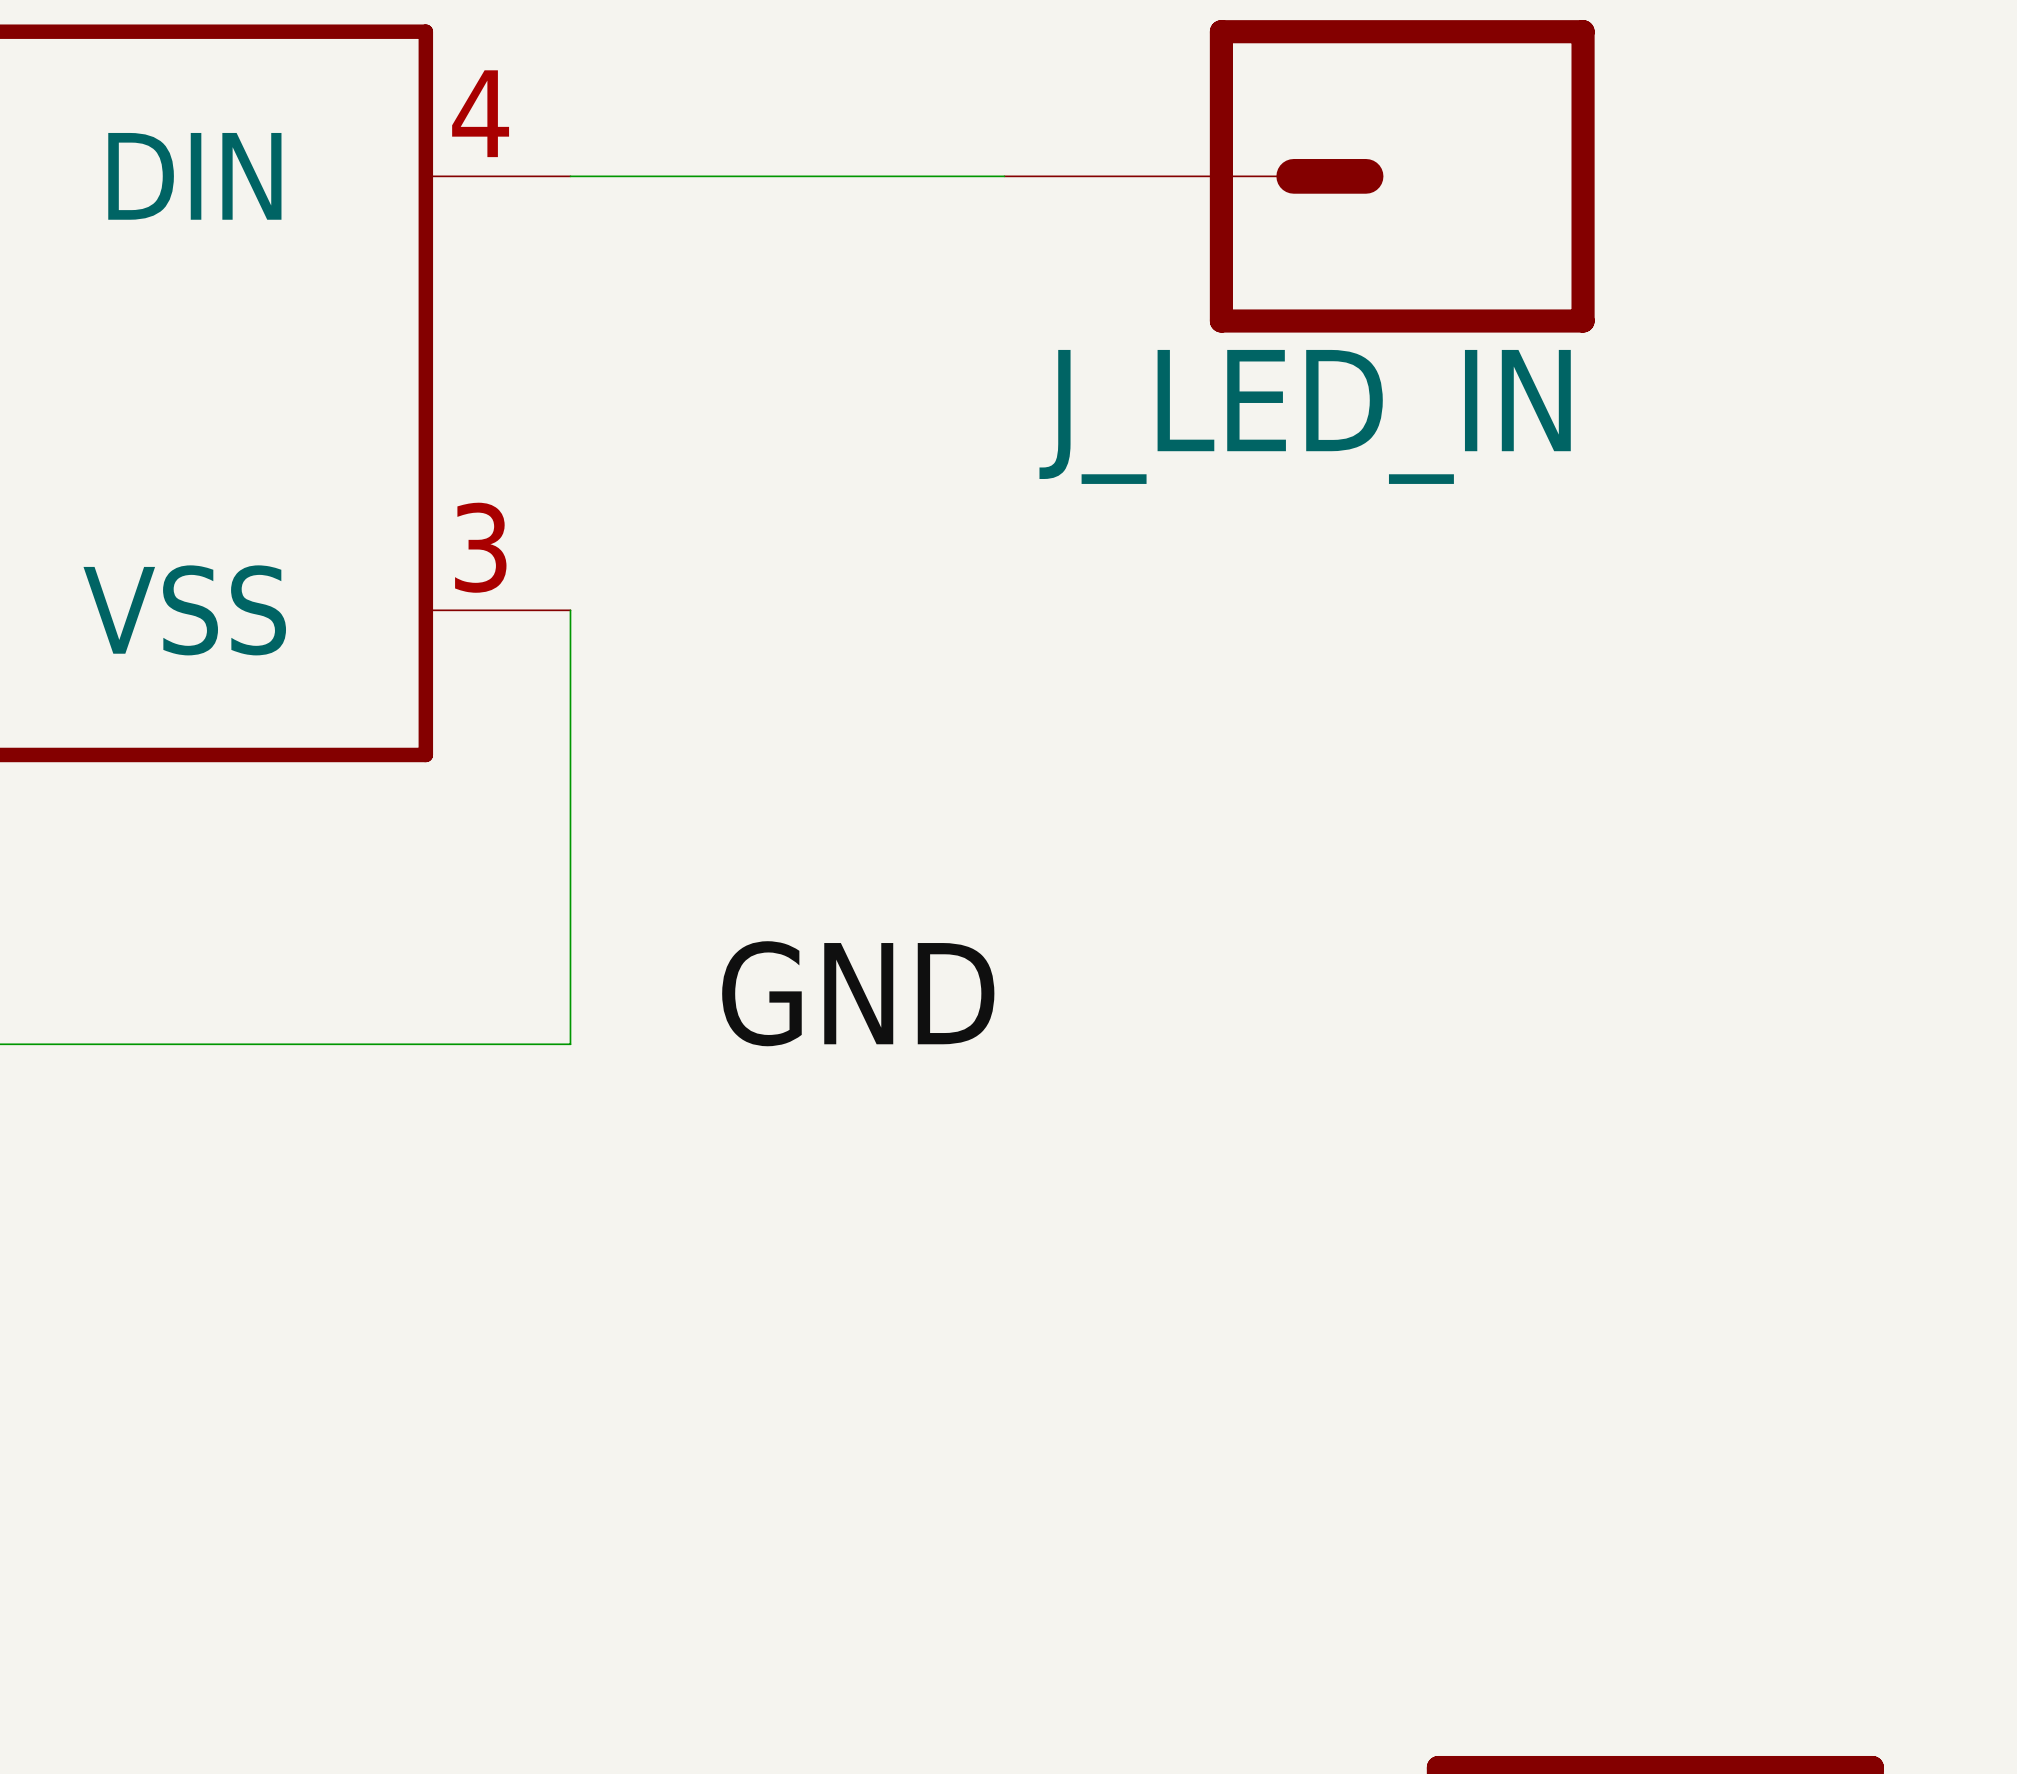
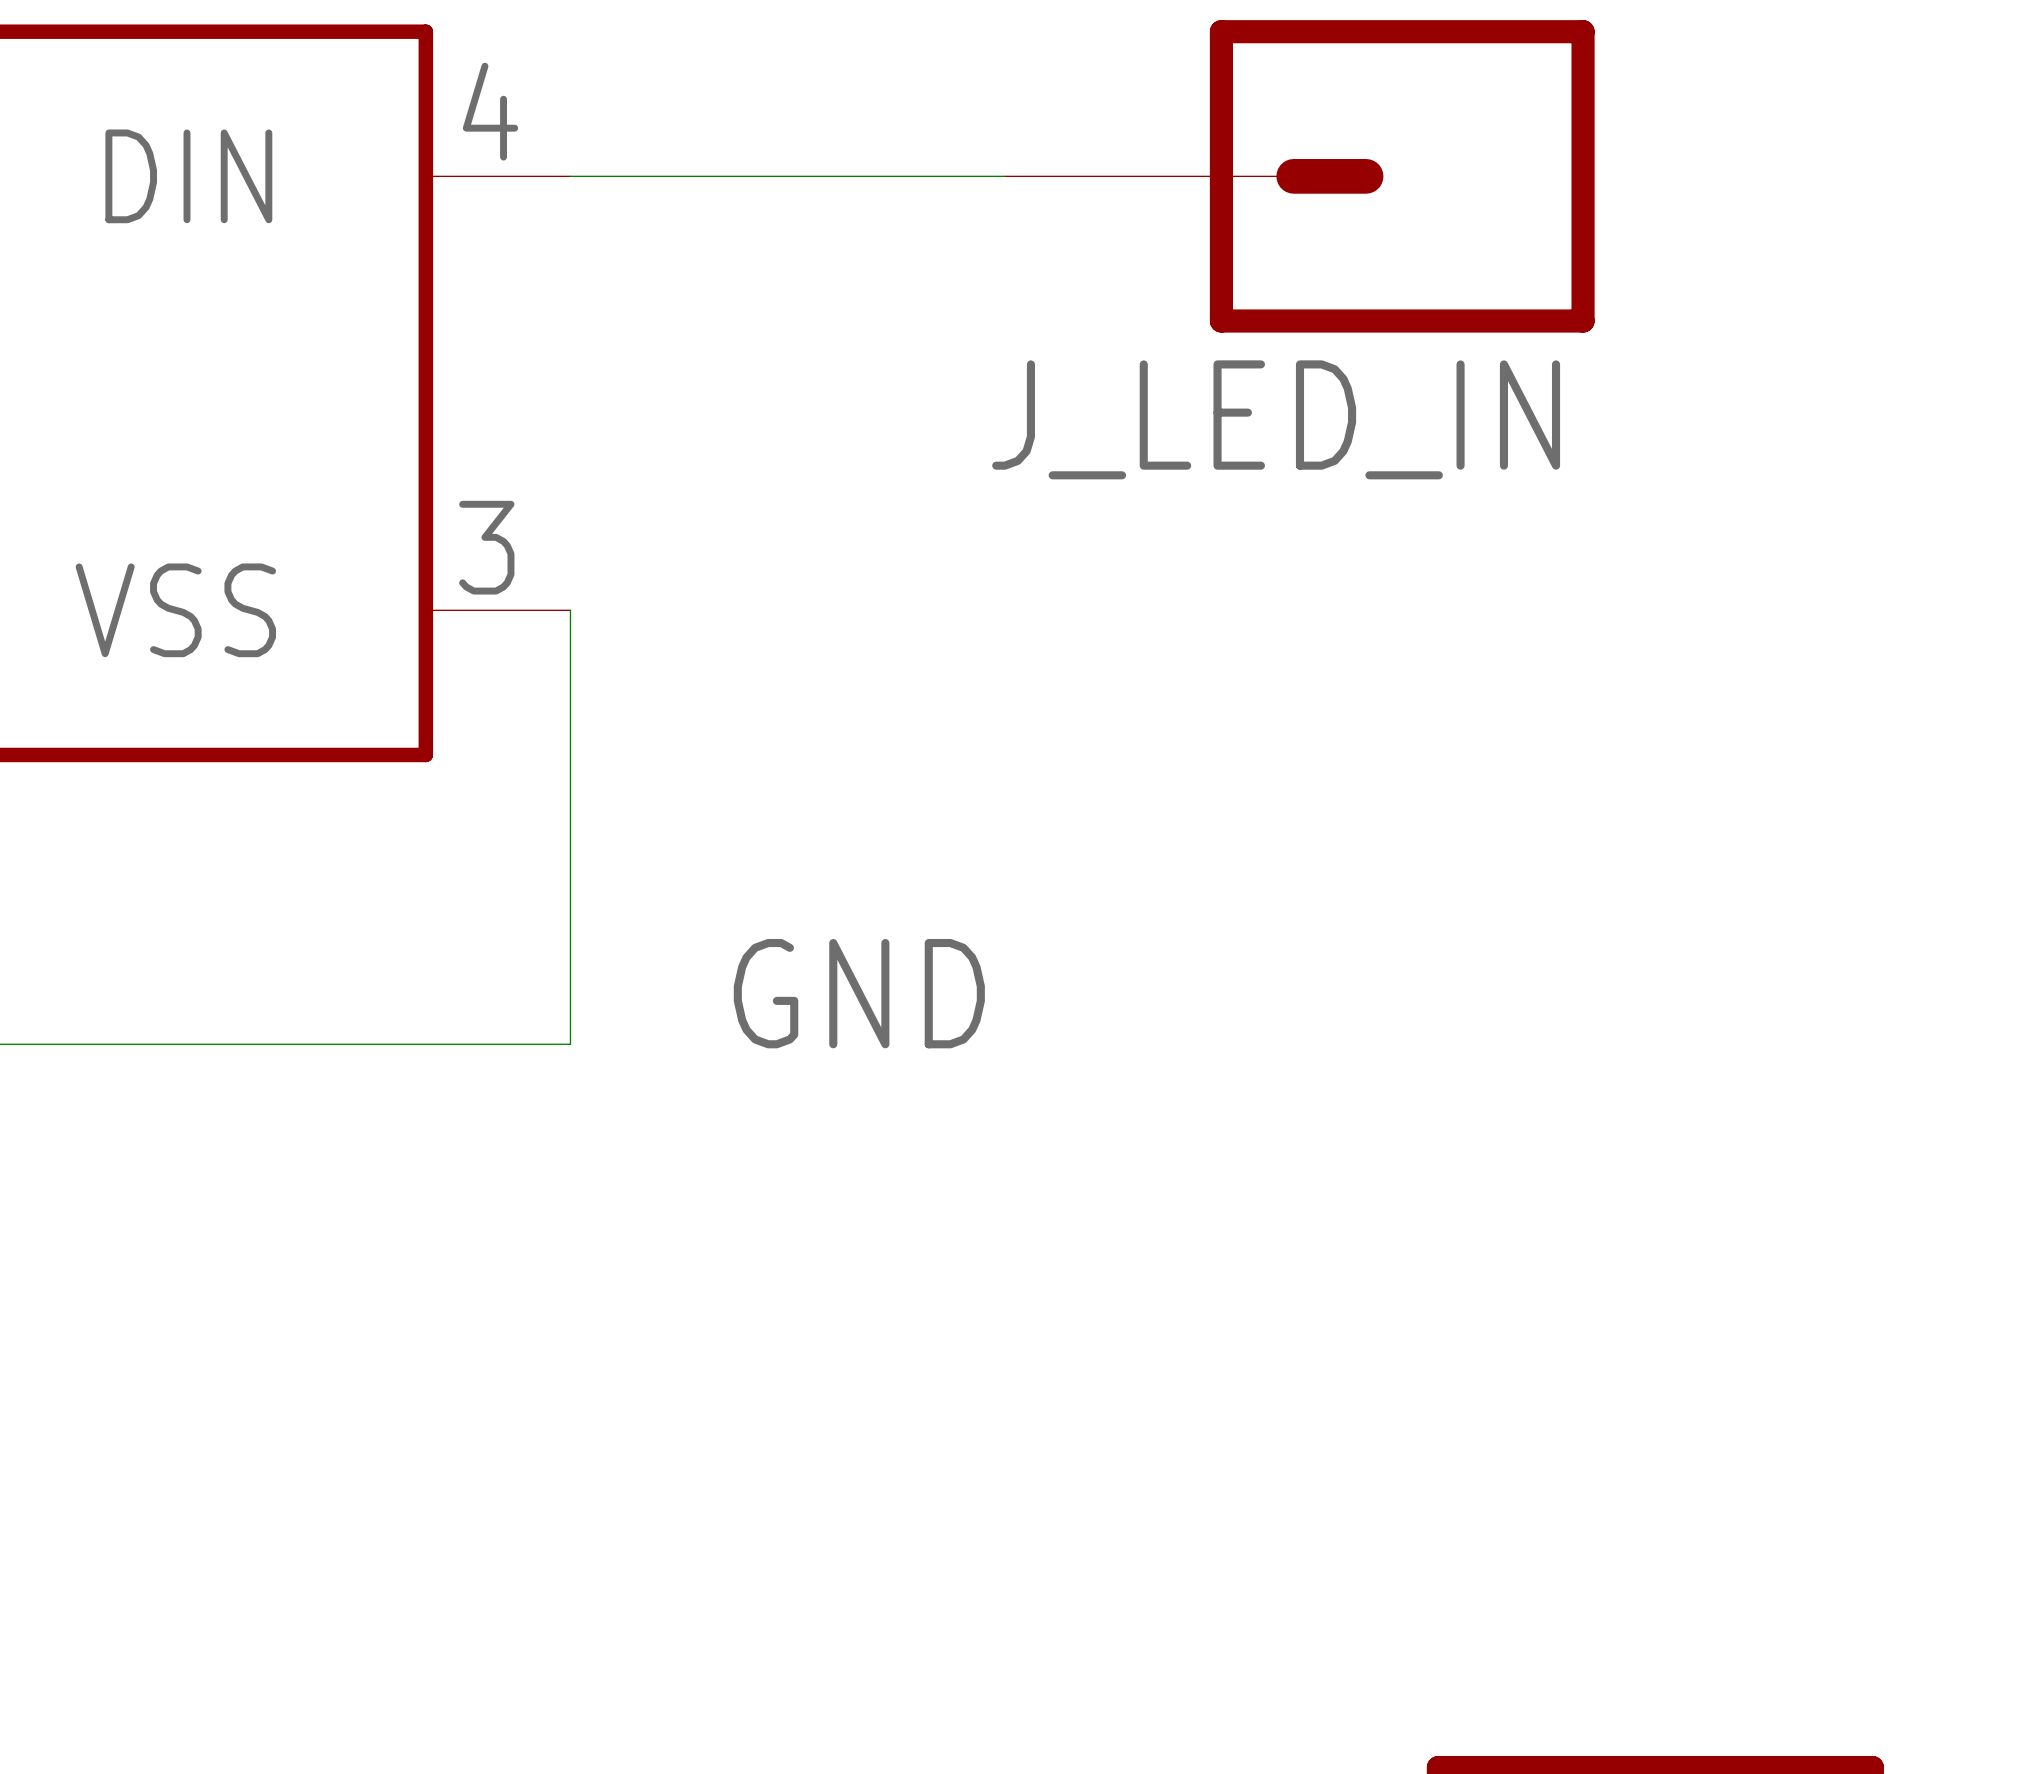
J_LED_IN name position: J_LED_IN (1305, 416) -> J_LED_IN (1276, 419)

